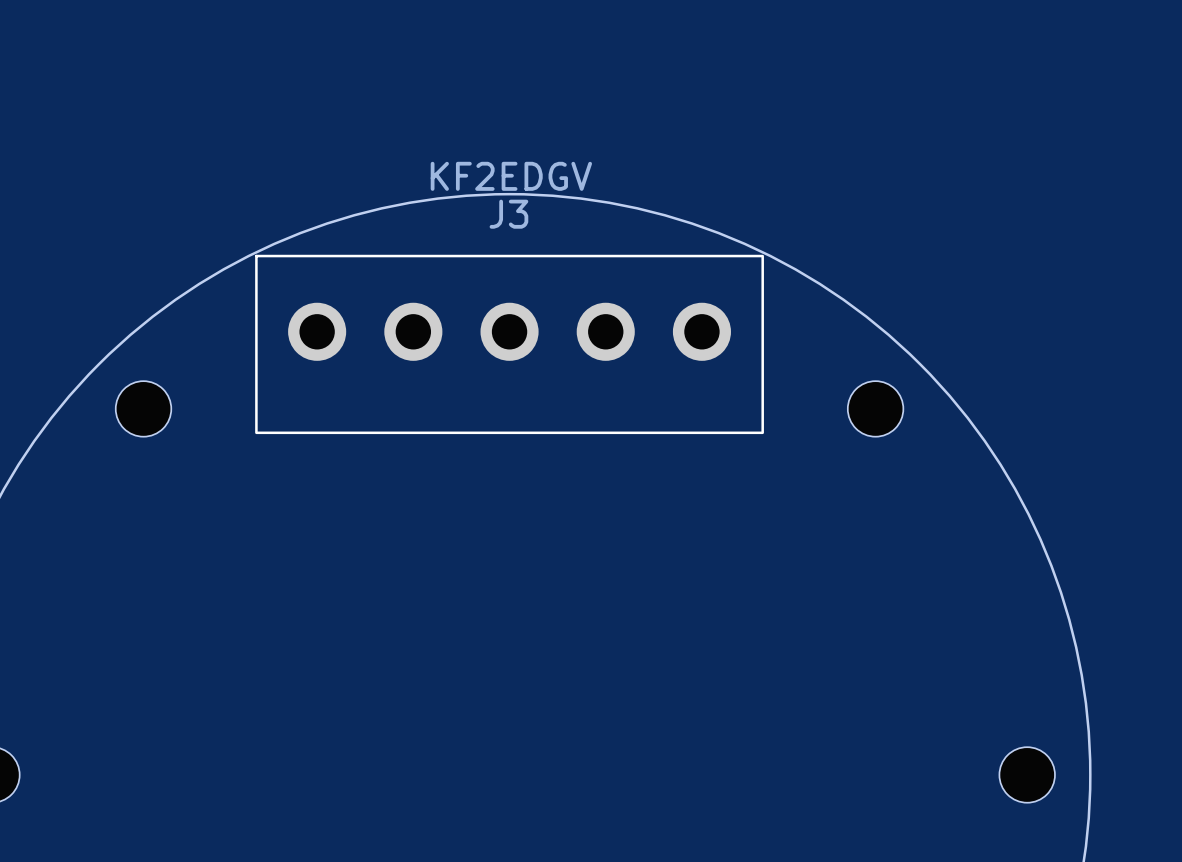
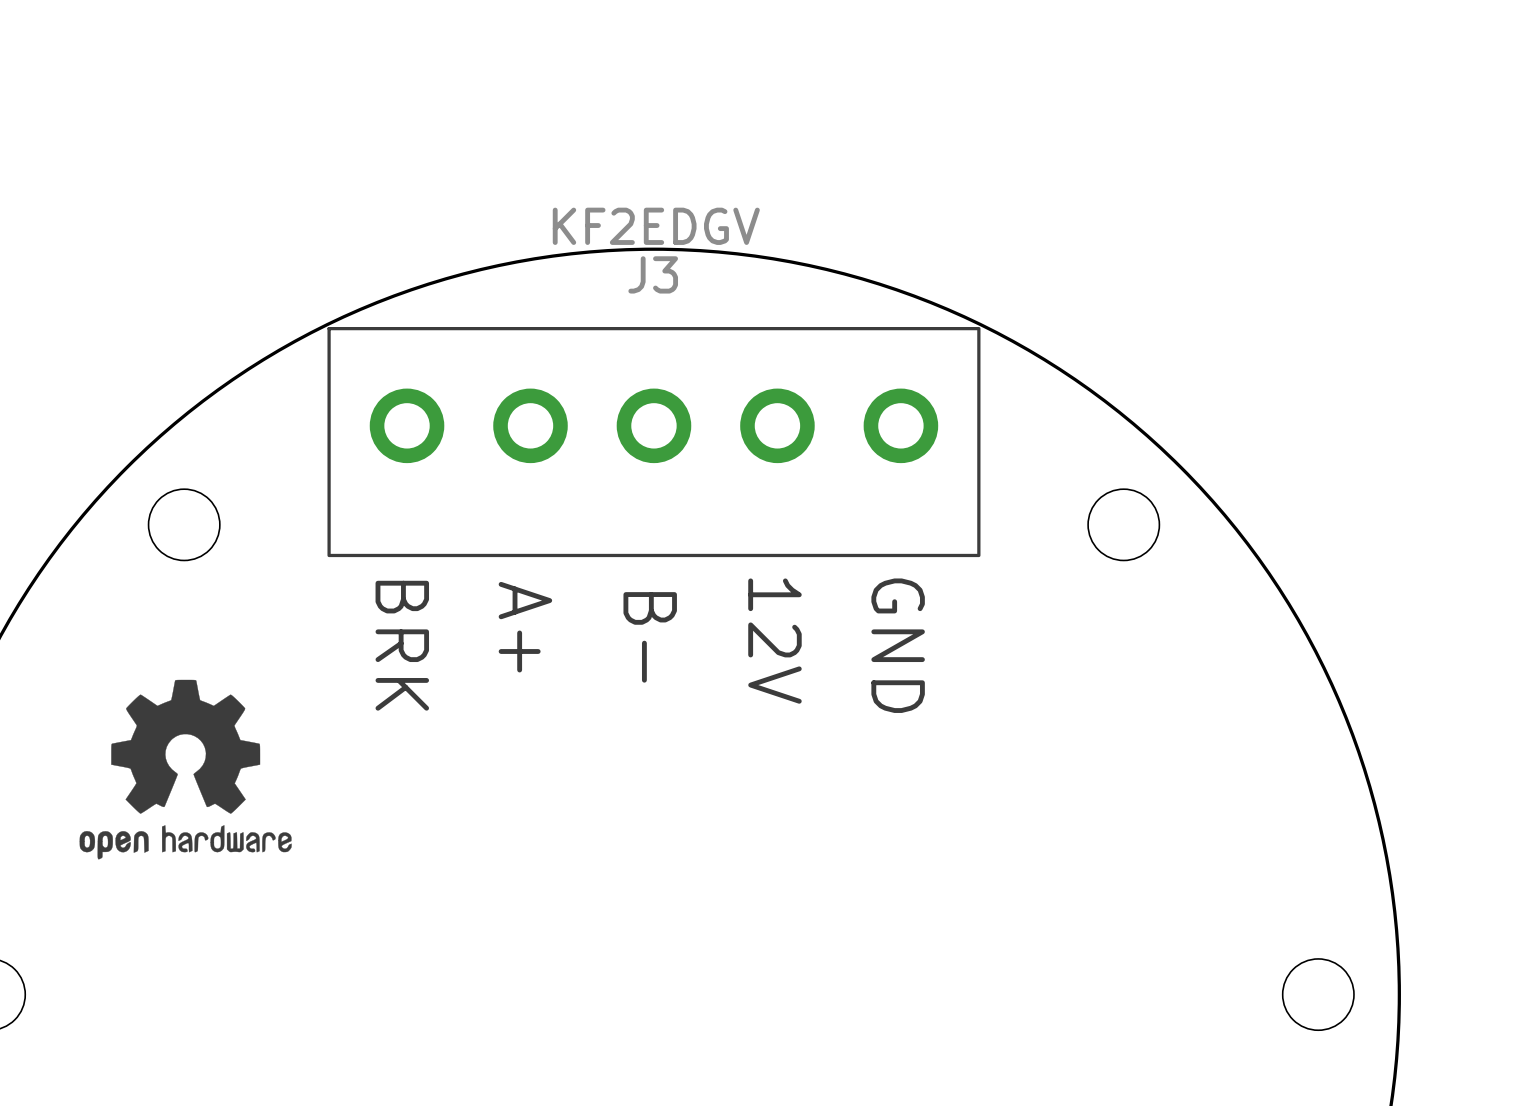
text: none -> A+ (525, 627)
text: none -> B- (650, 637)
text: none -> 12V (774, 641)
text: none -> BRK (402, 645)
text: none -> GND (898, 645)
drawing: none -> [79, 679, 292, 860]

